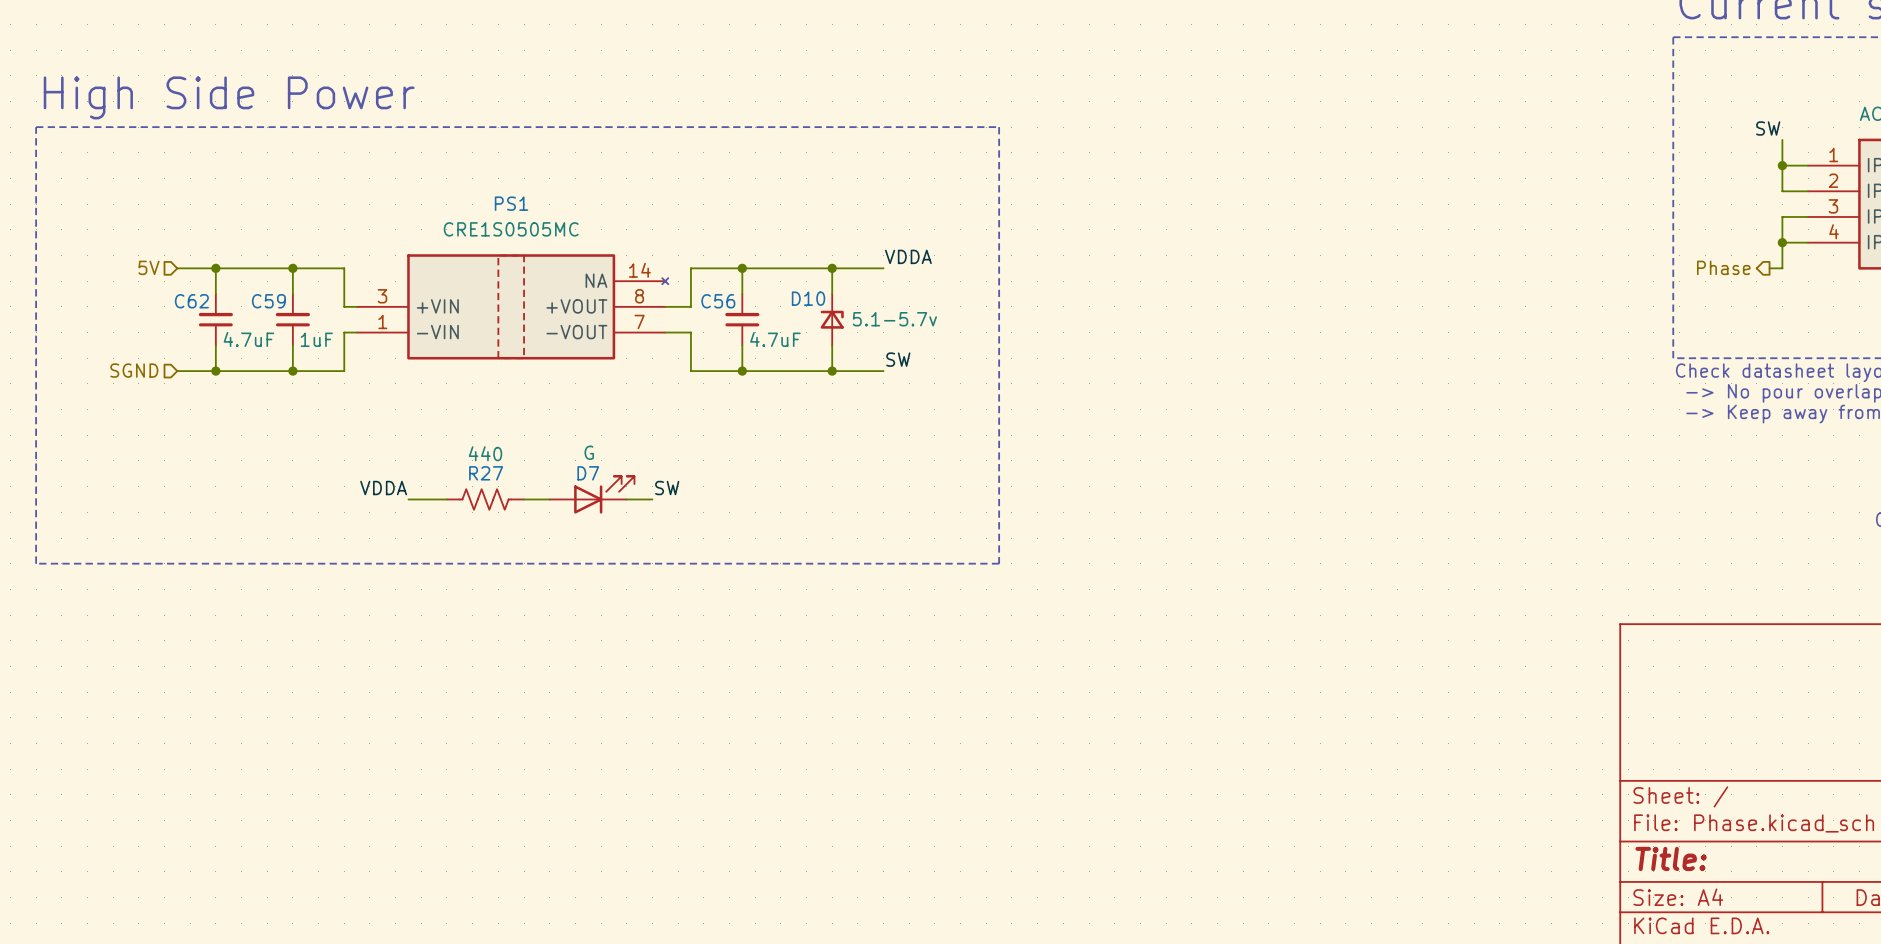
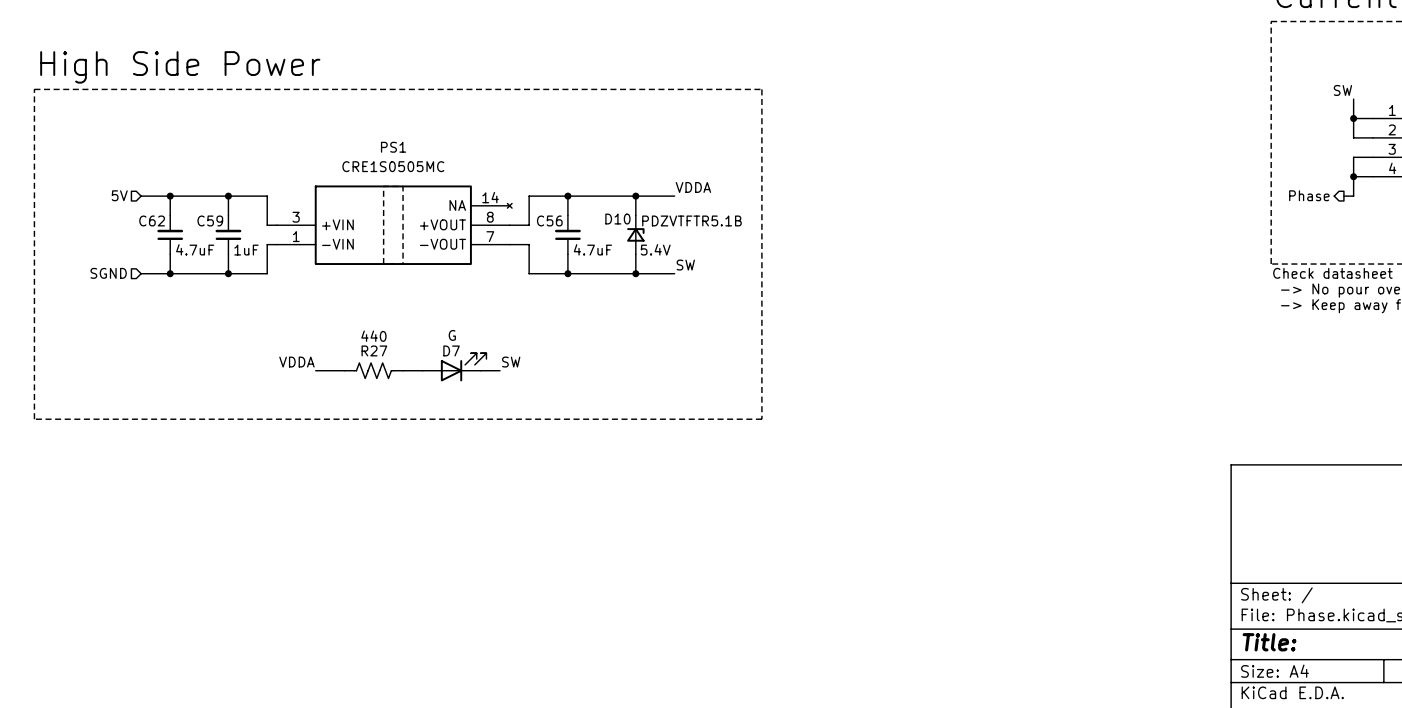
D10 value: 5.1-5.7v (894, 319) -> PDZVTFTR5.1B (691, 220)
D10 text: none -> 5.4V (655, 249)

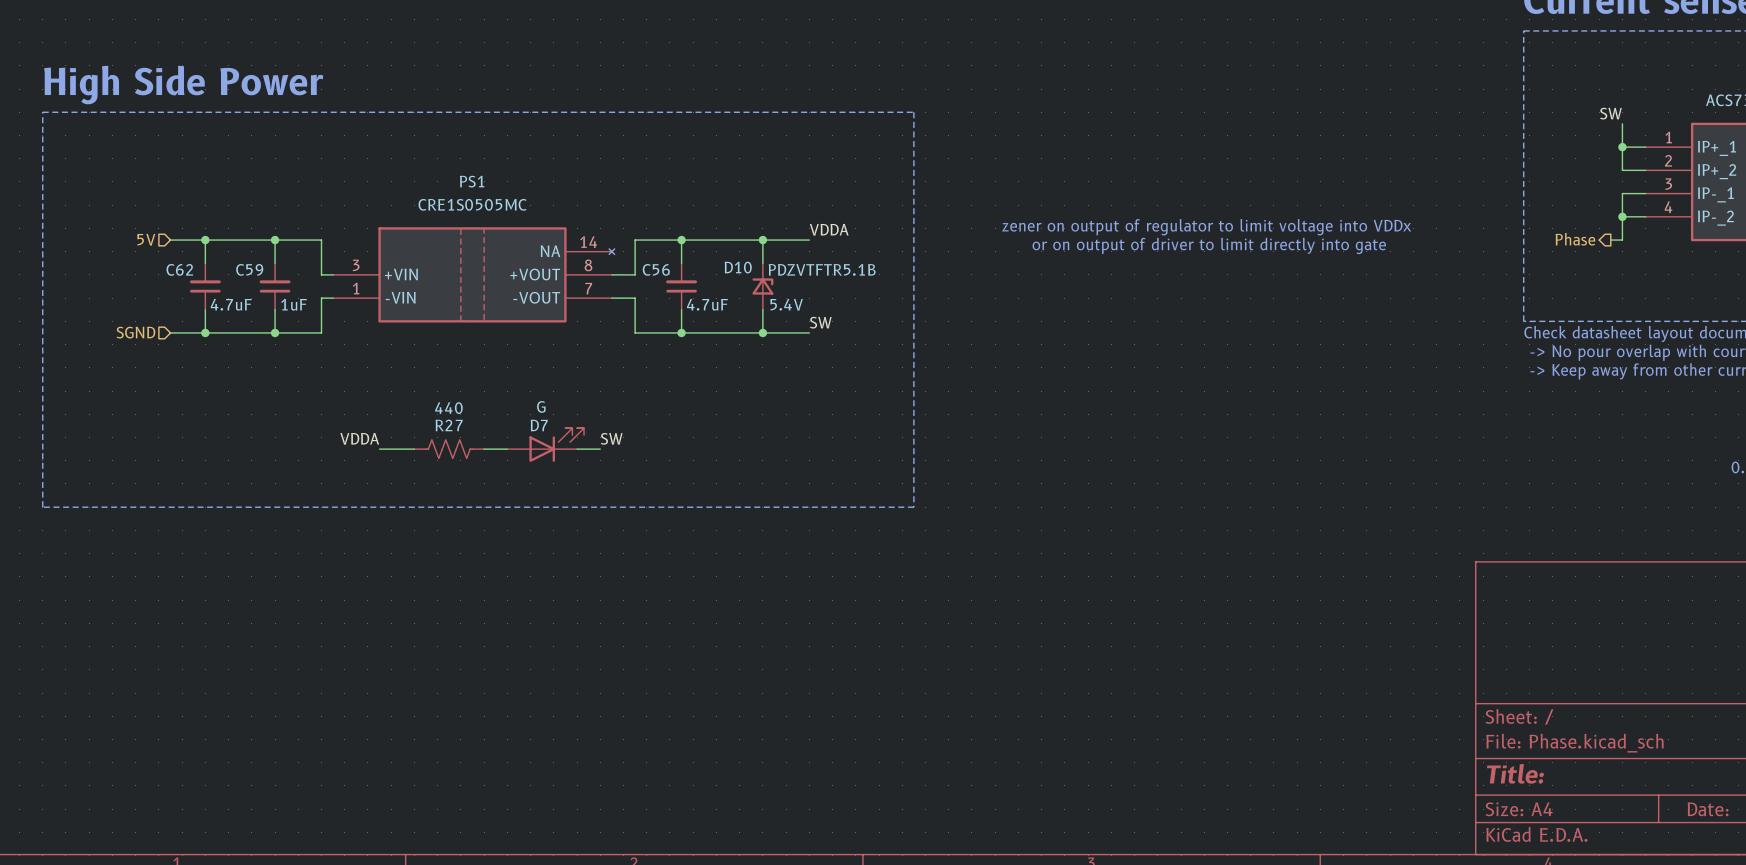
text: none -> zener on output of regulator to limit voltage into VDDx (1206, 227)
text: none -> or on output of driver to limit directly into gate (1209, 245)

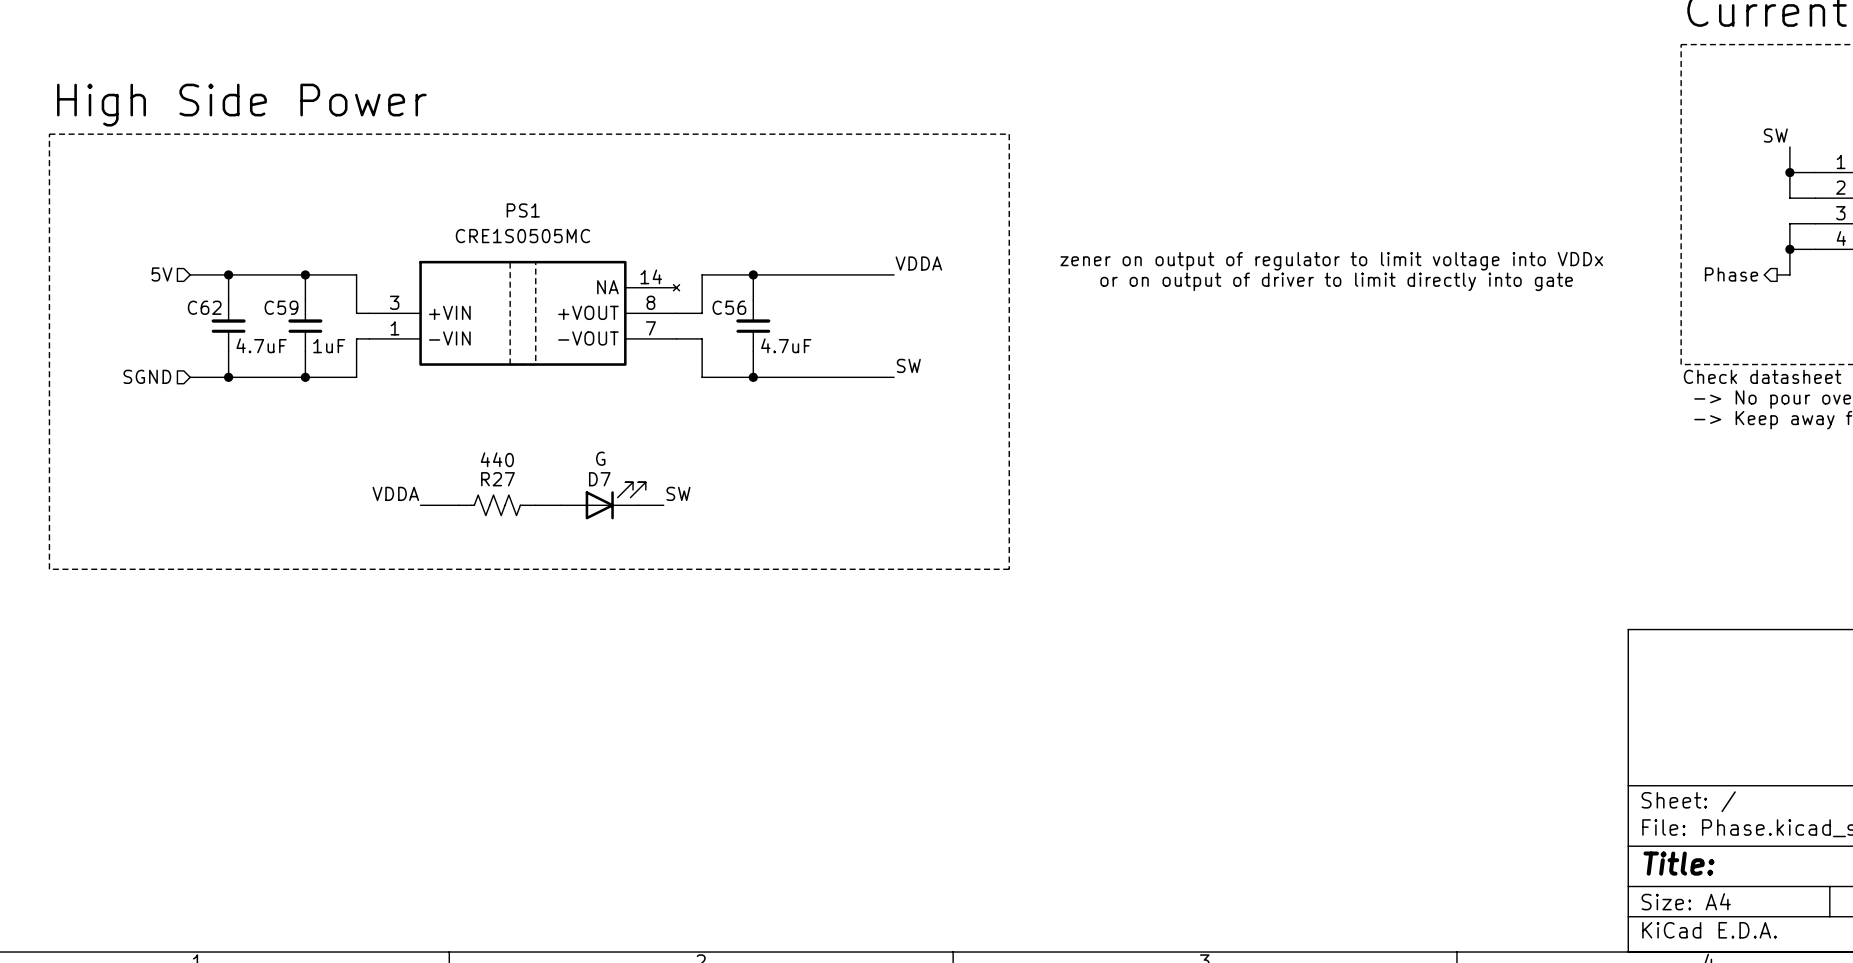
wire: (762, 240) (762, 263) -> none
junction: (762, 240) -> none
D10: PDZVTFTR5.1B (762, 286) -> none
wire: (762, 309) (762, 332) -> none
junction: (762, 332) -> none

